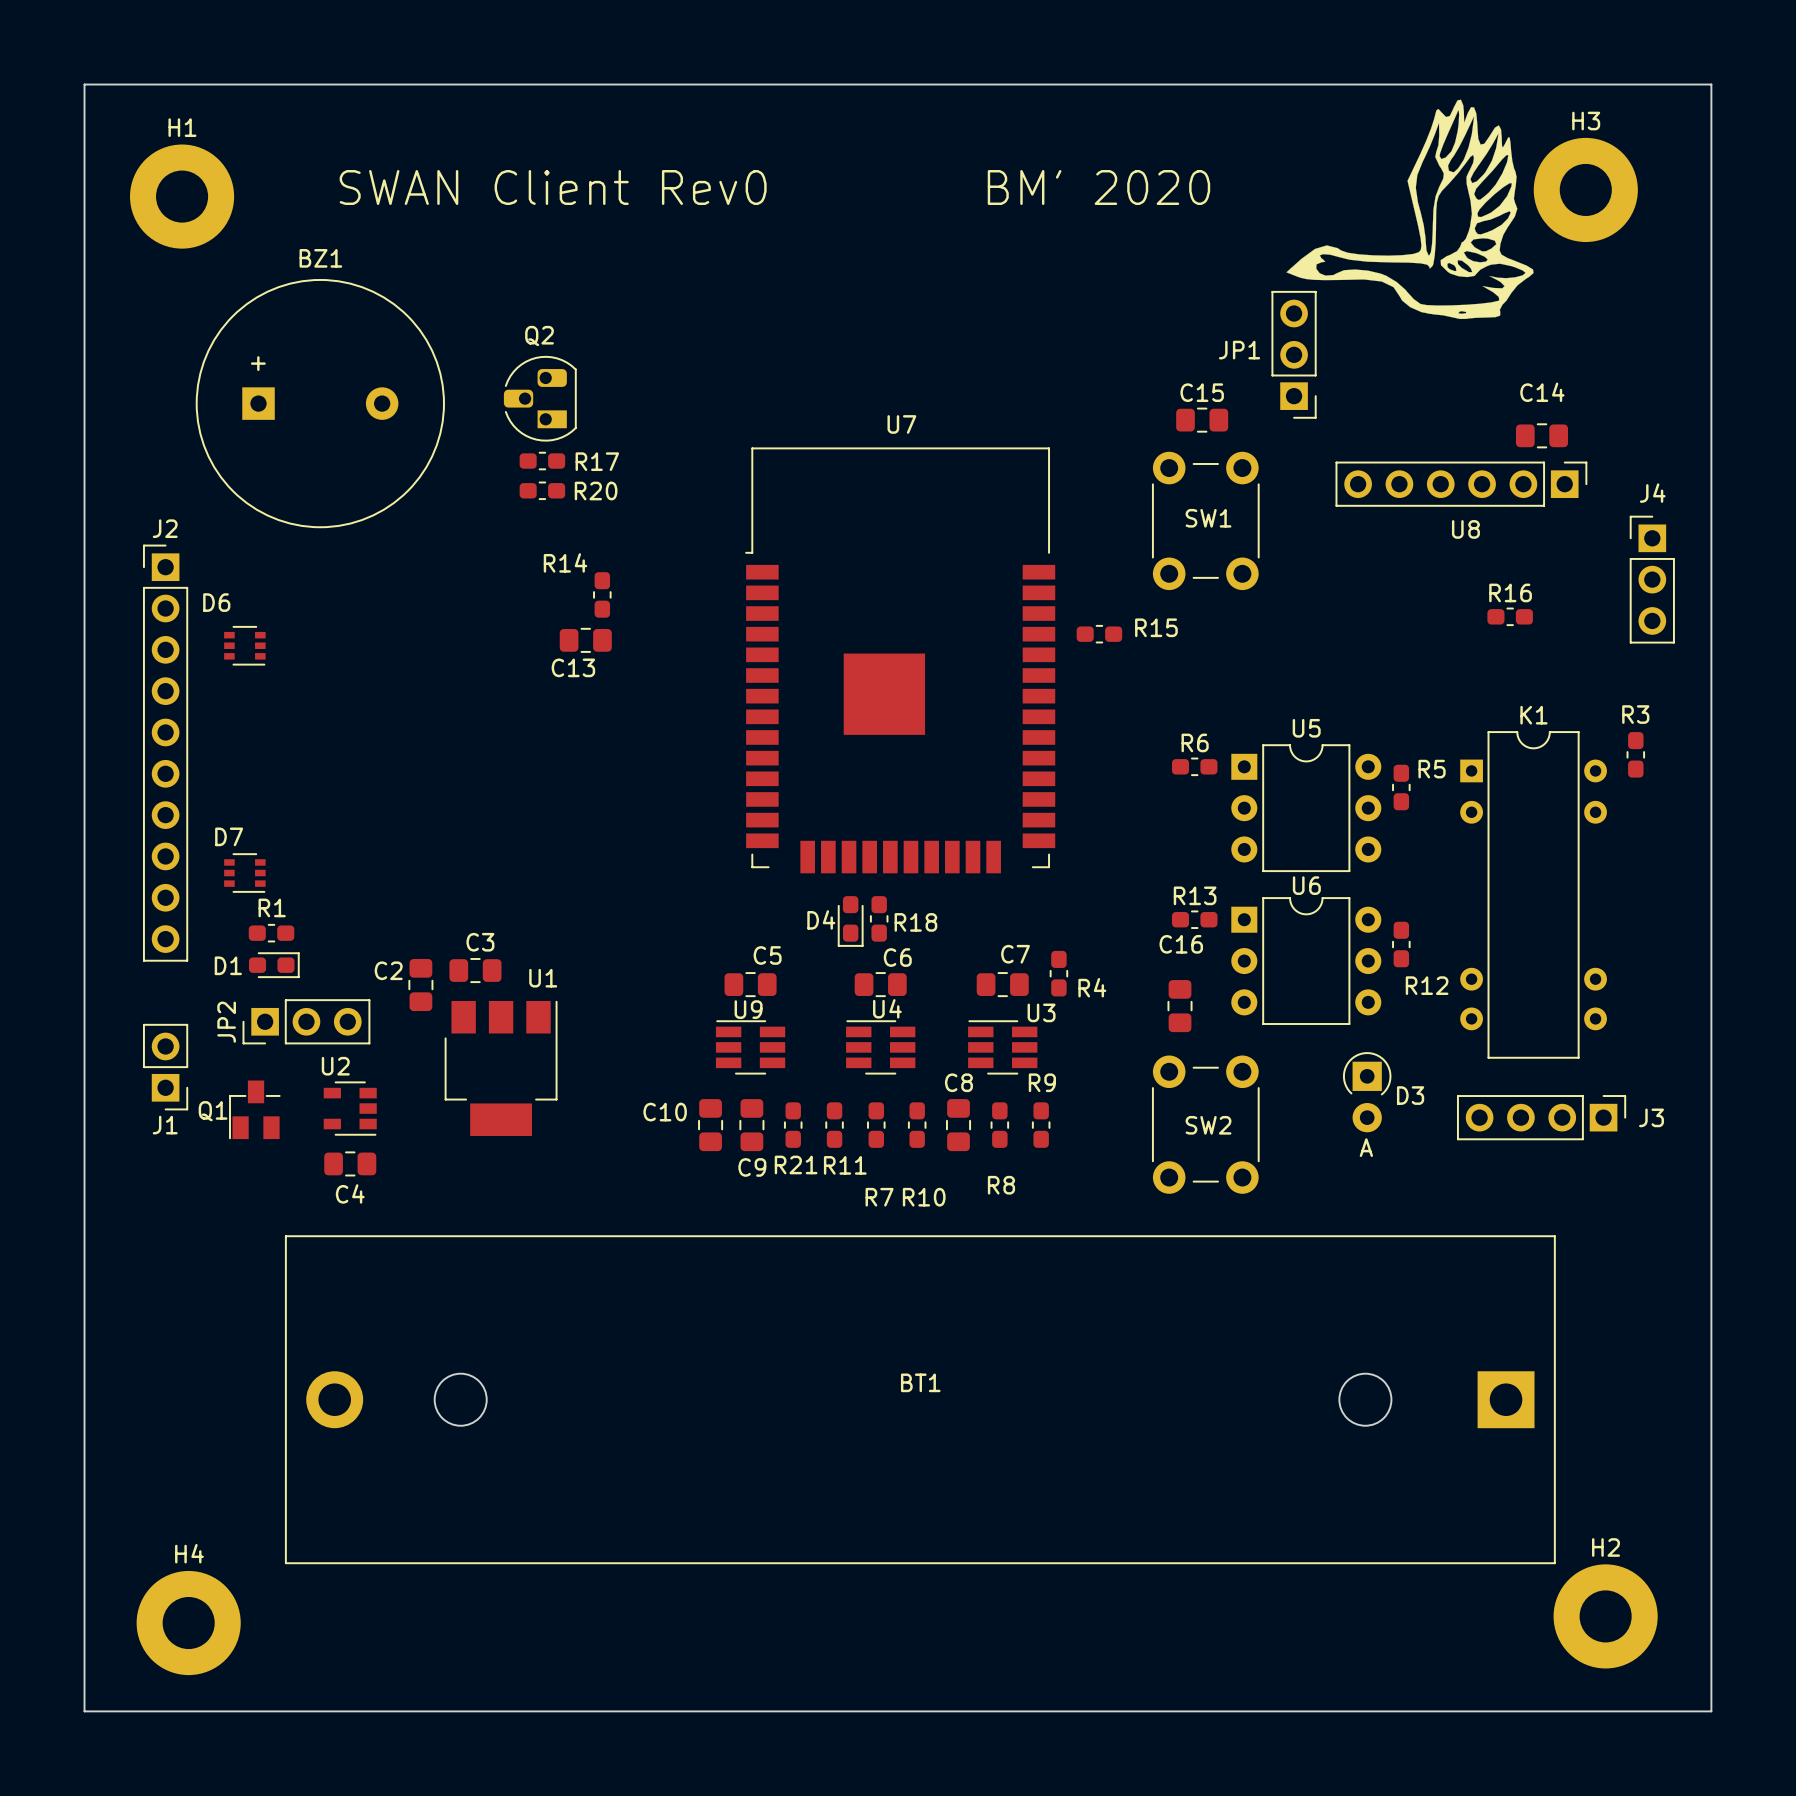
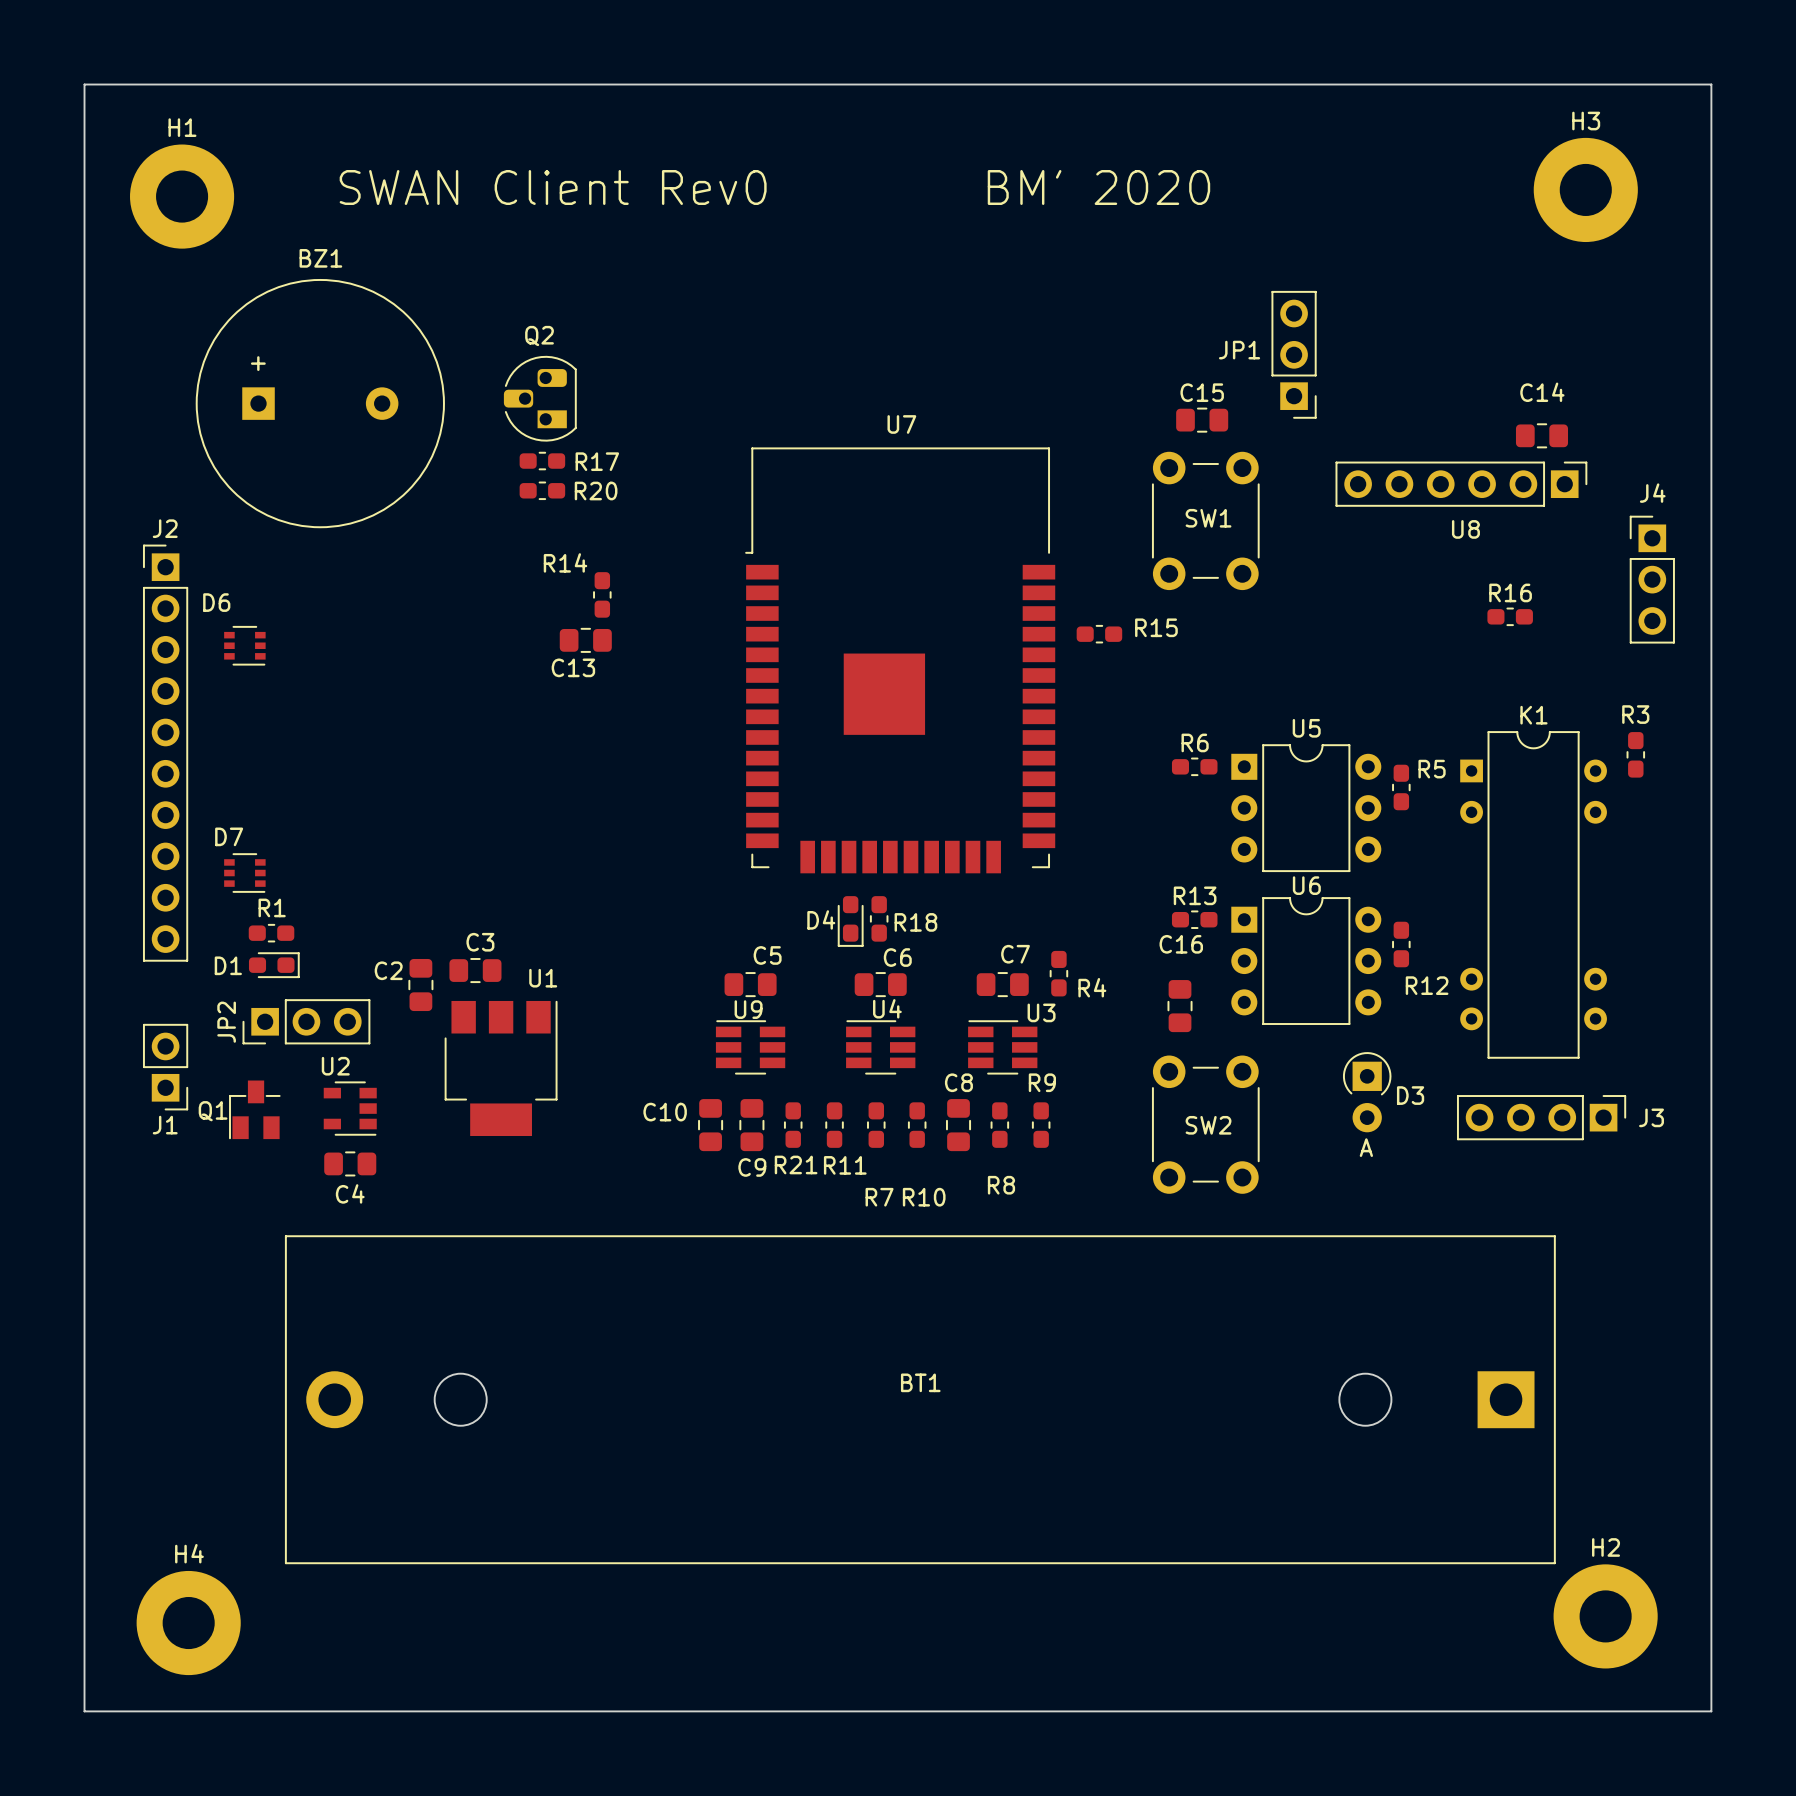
drawing: [1286, 99, 1534, 320] -> none

